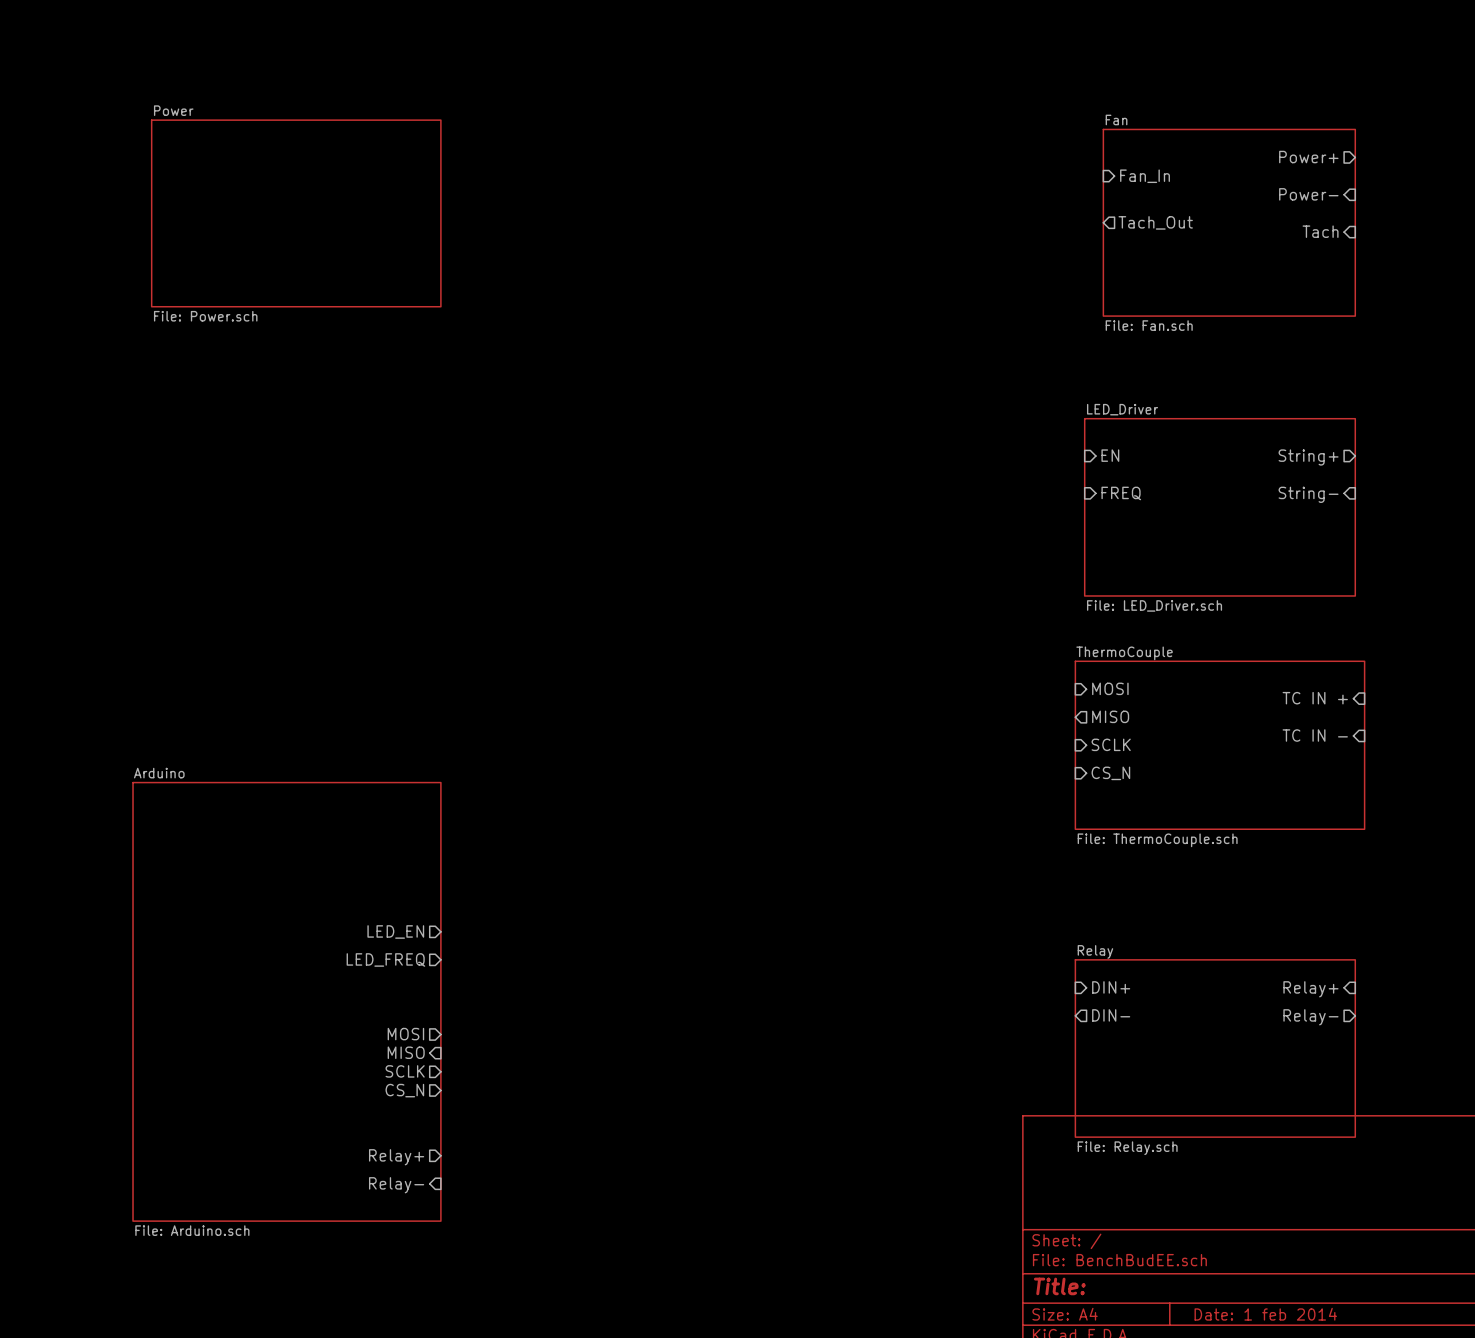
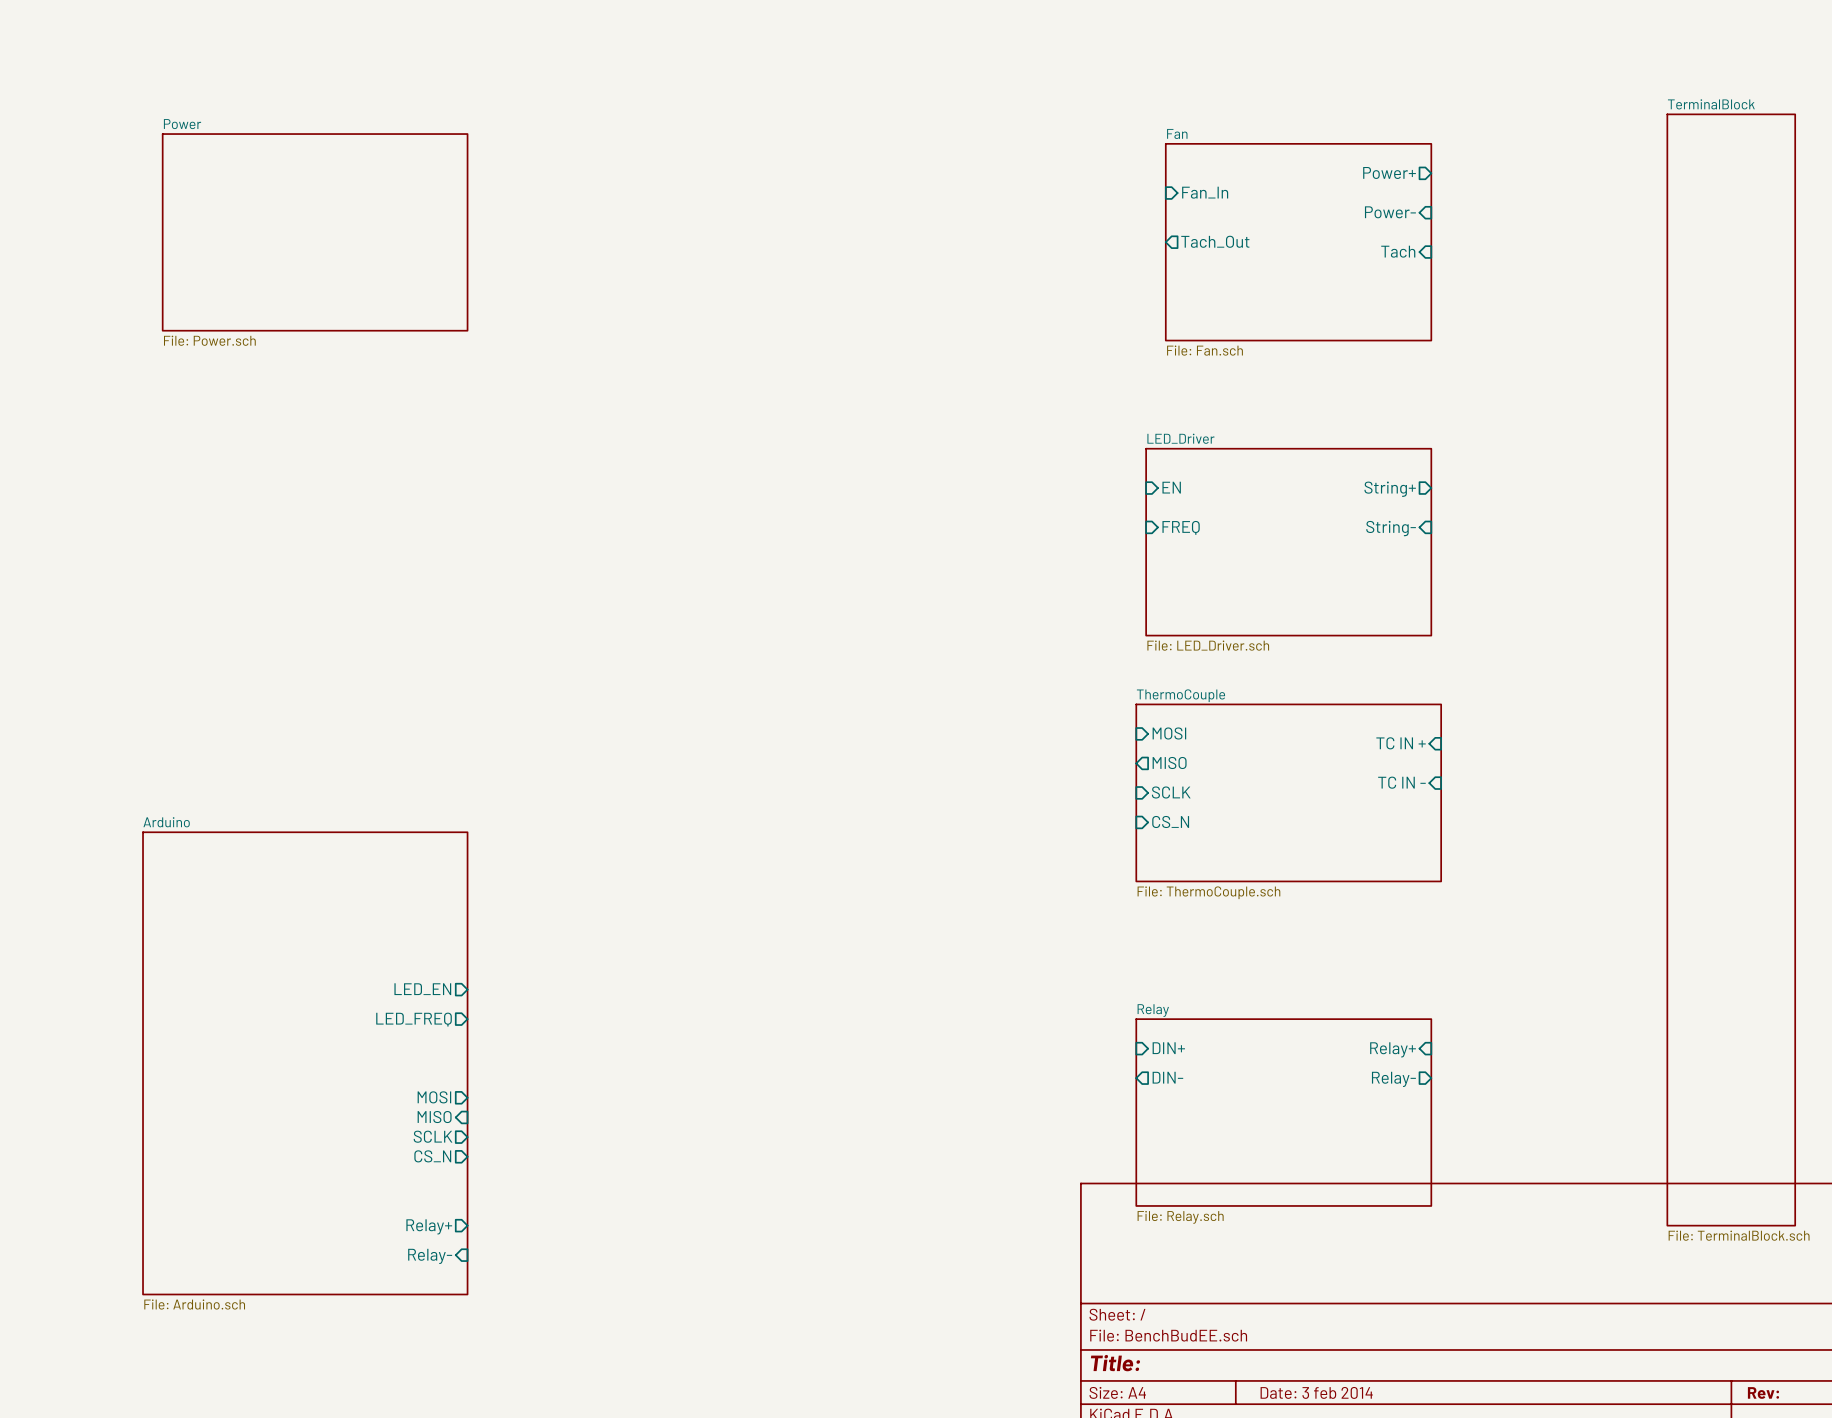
title block: Date: 1 feb 2014 (1265, 1314) -> Date: 3 feb 2014 (1316, 1392)

